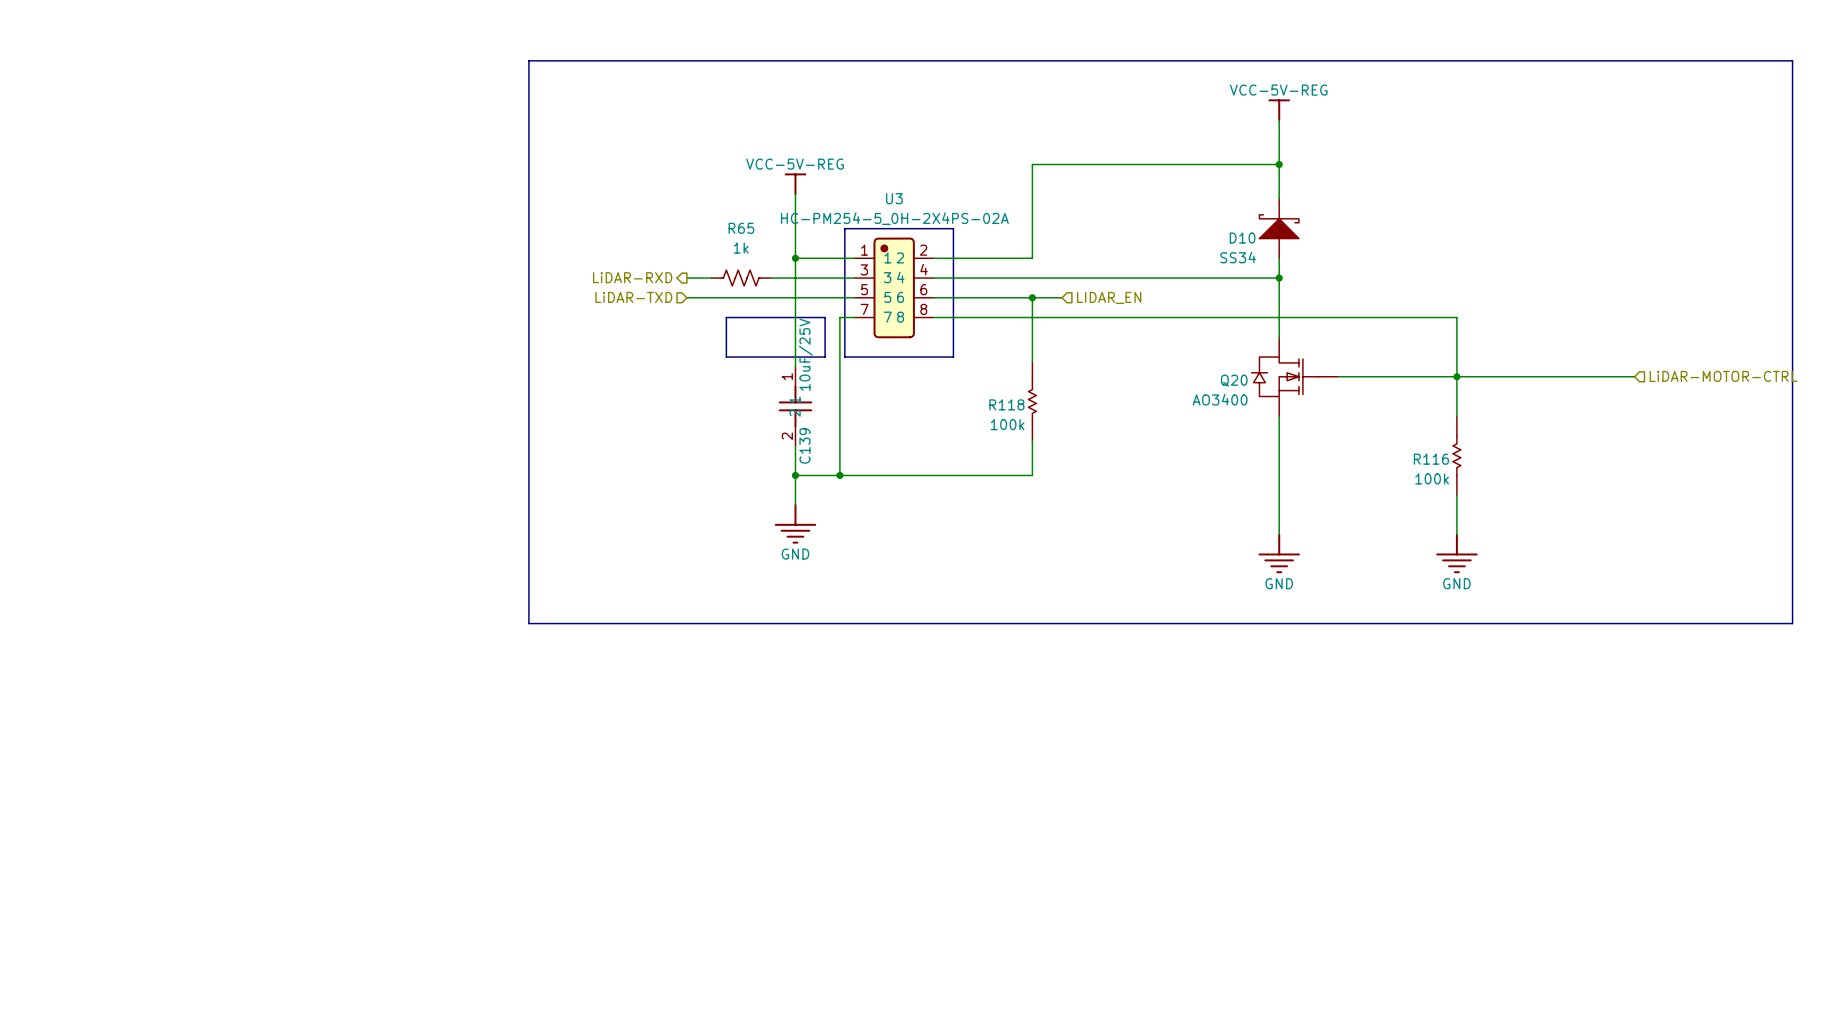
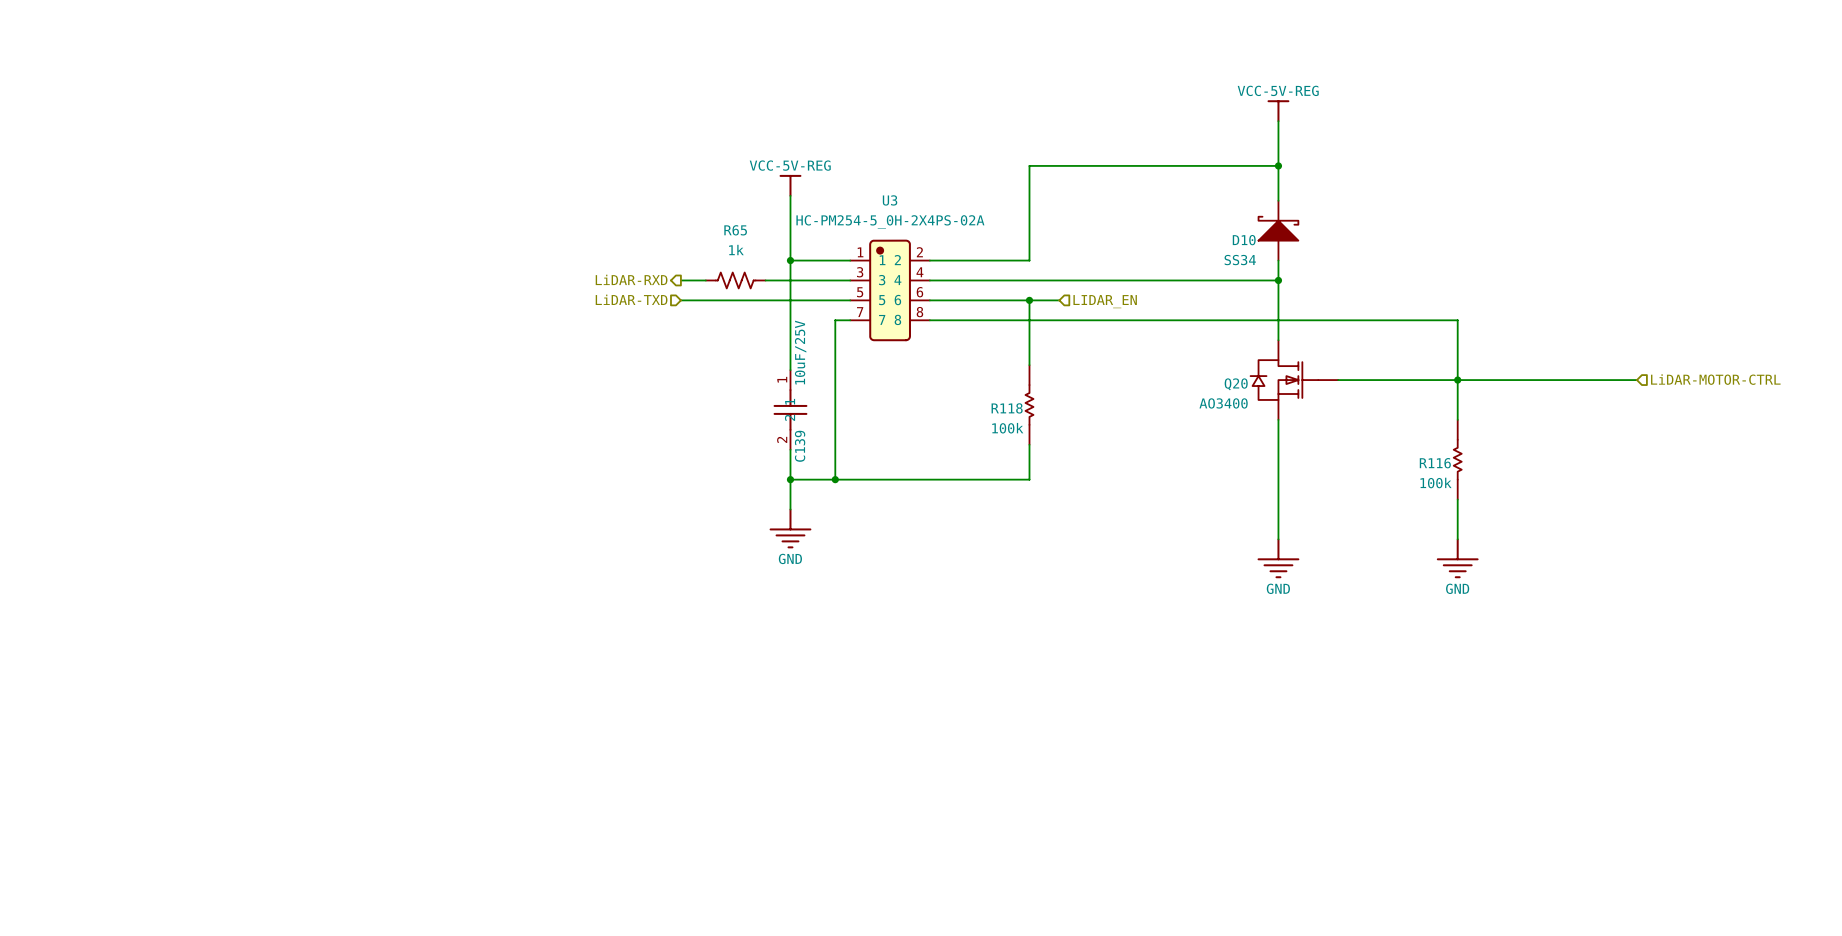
line: (528, 60) (1792, 60) (1792, 623) (528, 623) (528, 60) -> none
line: (844, 228) (953, 228) (953, 357) (844, 357) (844, 228) -> none
line: (726, 317) (825, 317) (825, 357) (726, 357) (726, 317) -> none

